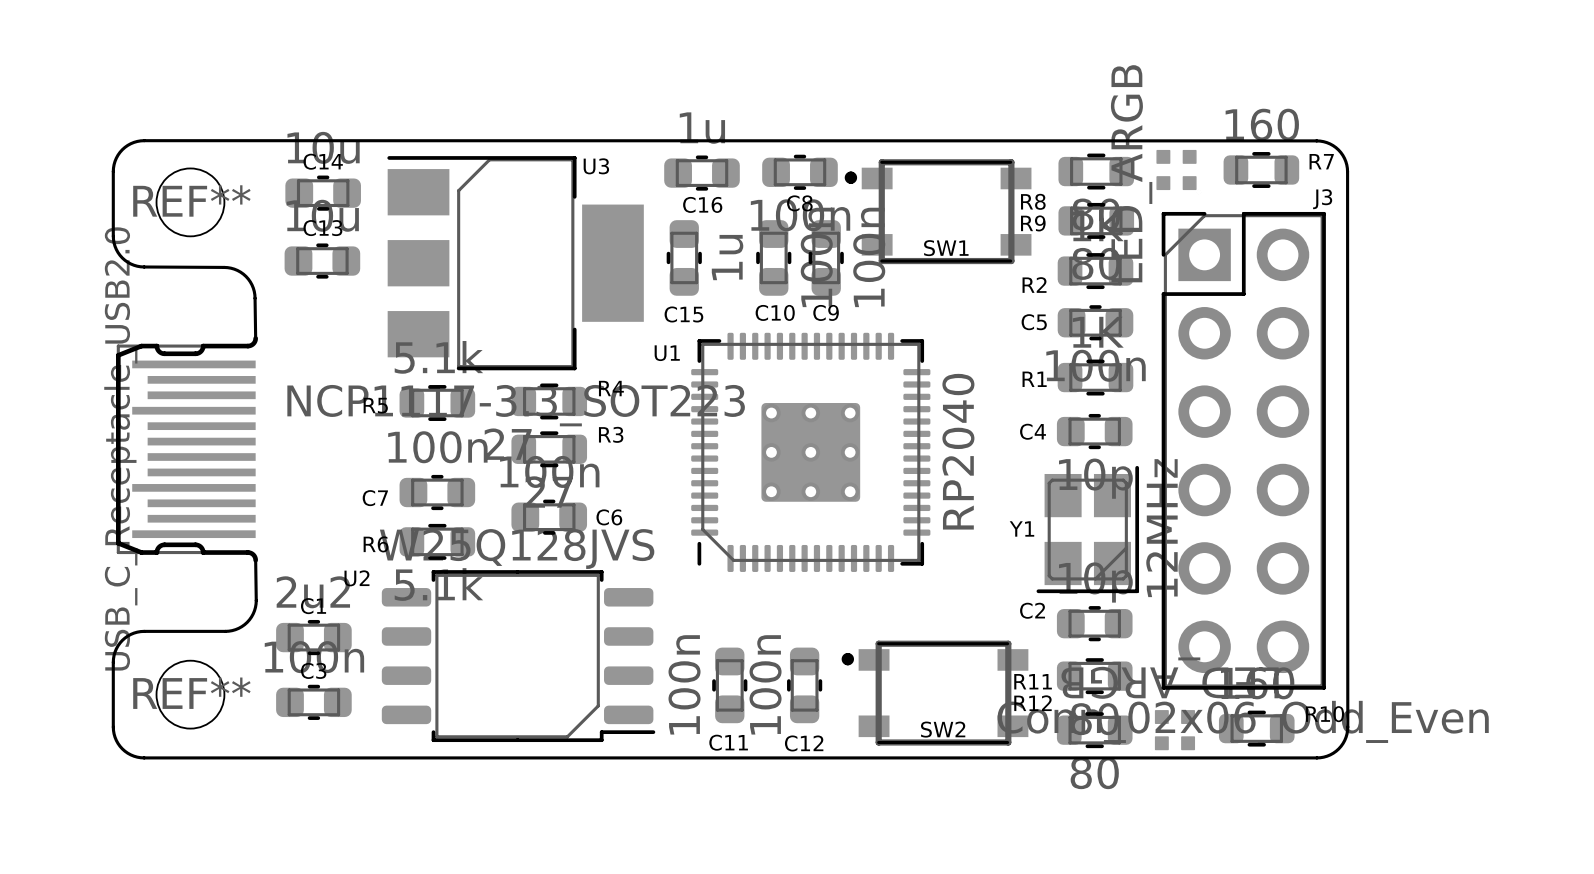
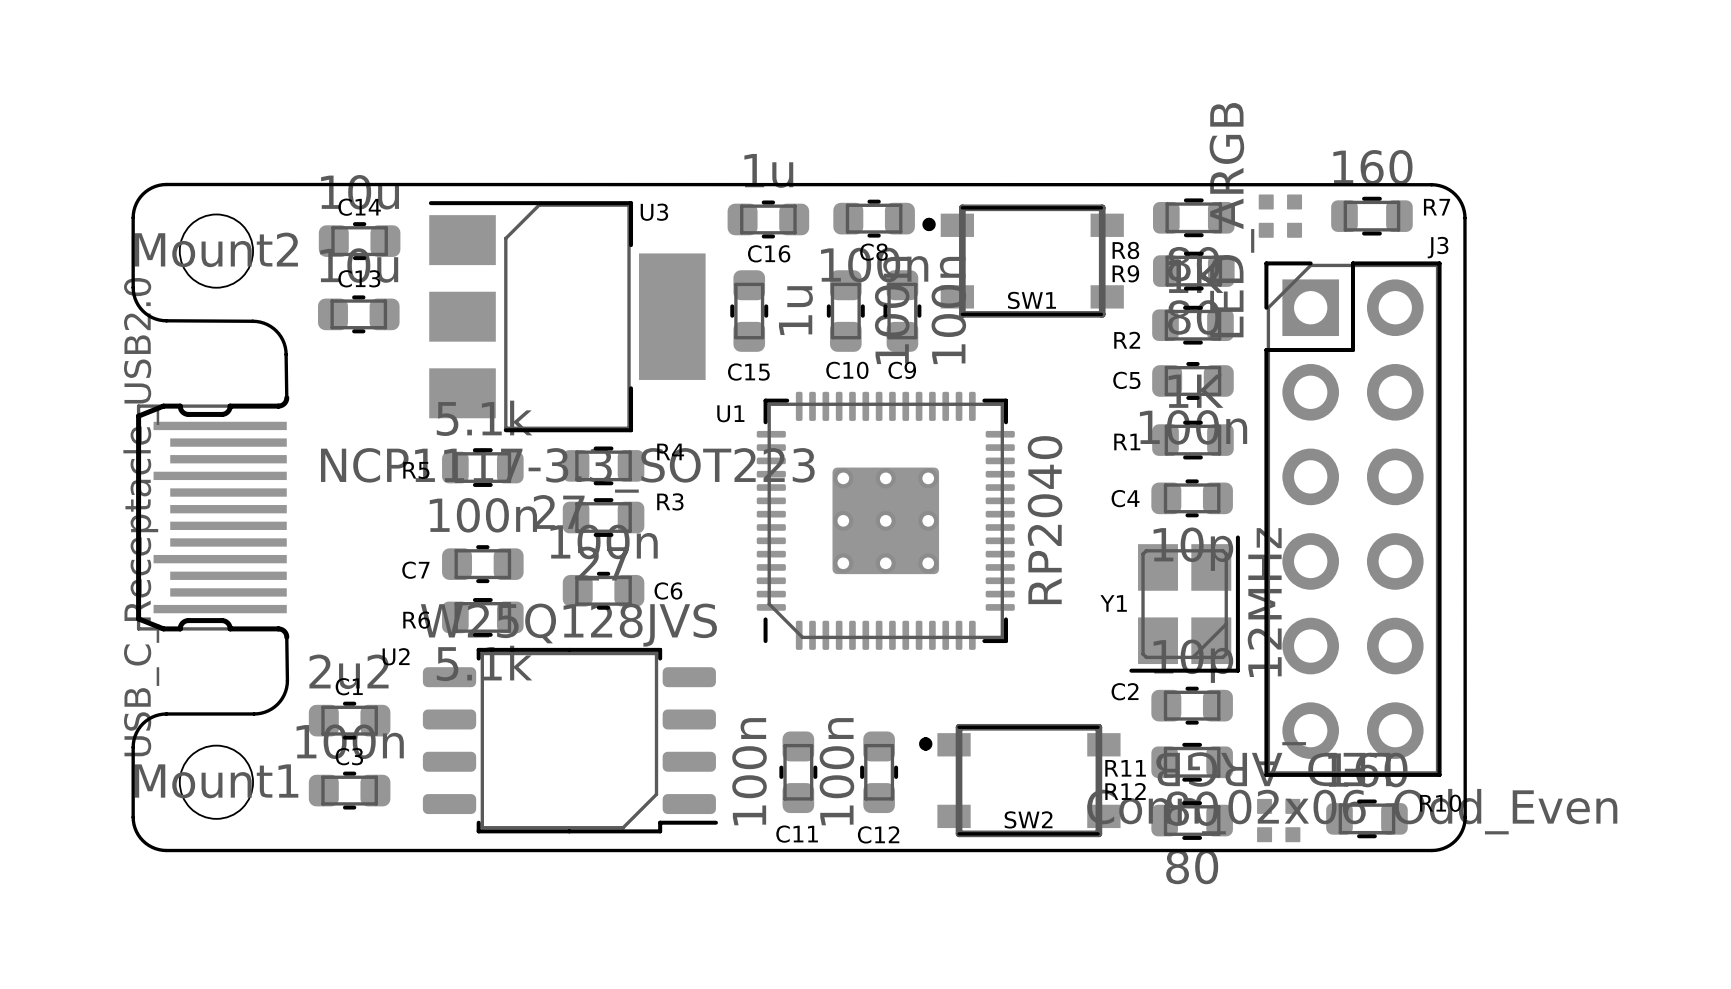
REF** name: REF** (191, 200) -> none
REF** text: none -> Mount2 (216, 249)
REF** text: none -> Mount1 (216, 781)
REF** name: REF** (191, 693) -> none

